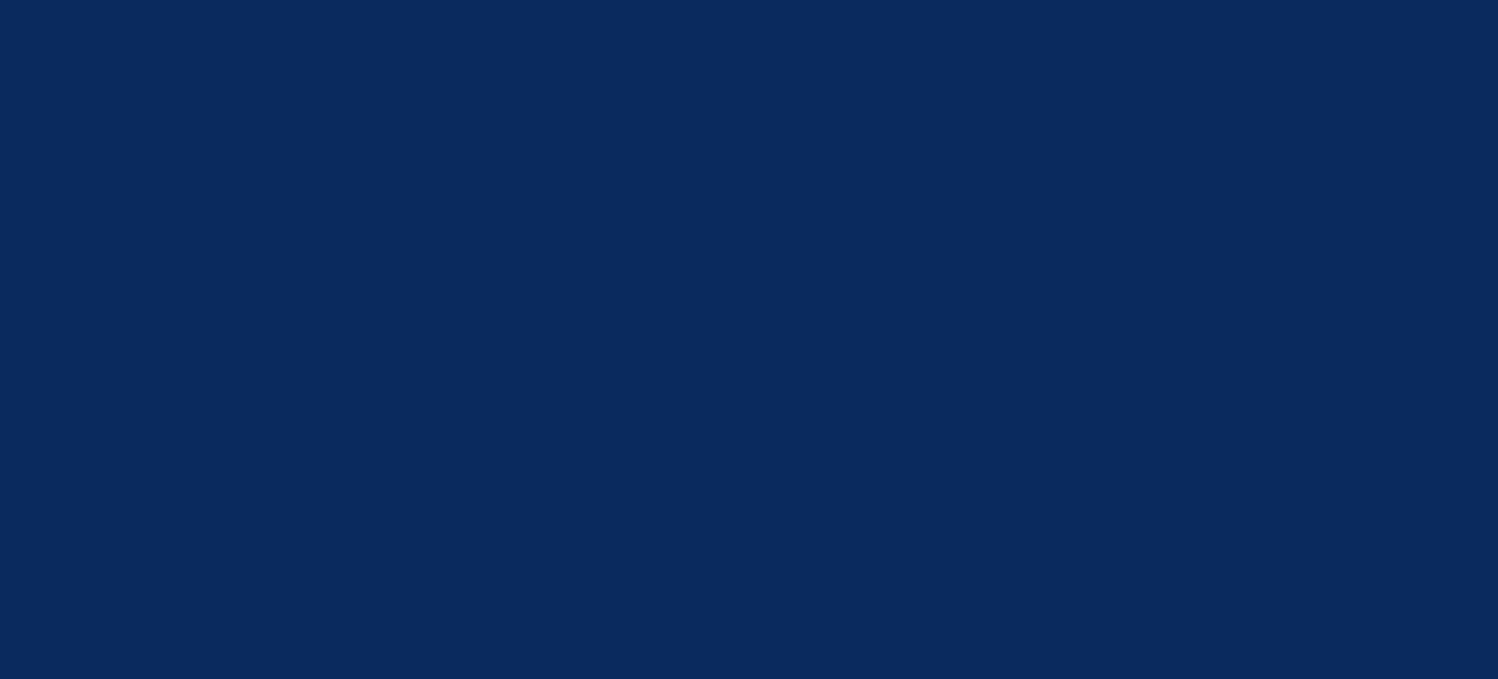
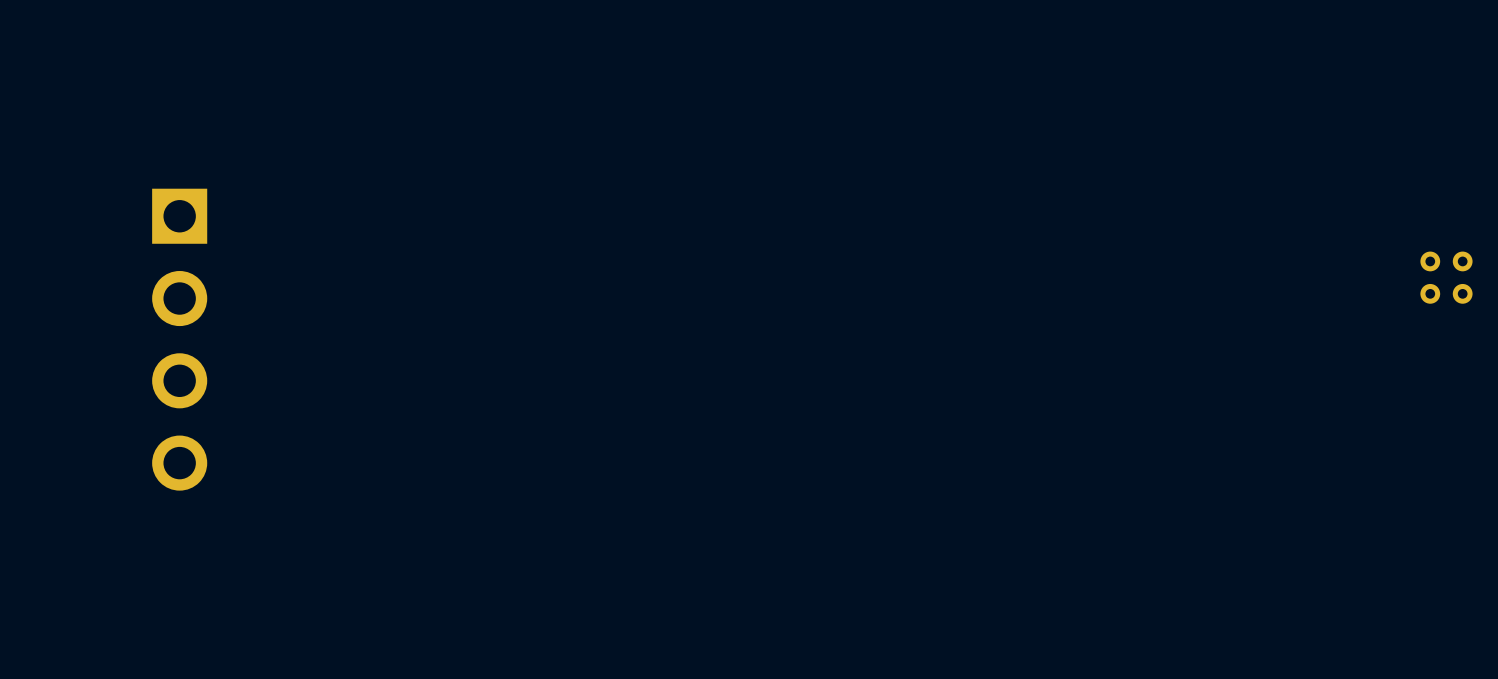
part: none -> (1446, 277)
part: none -> (179, 339)

